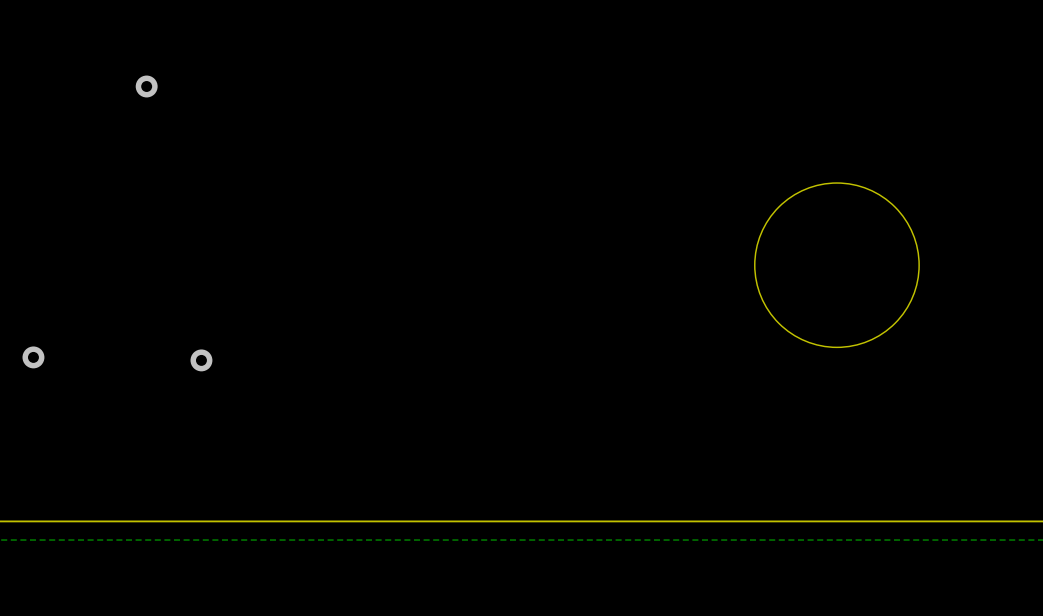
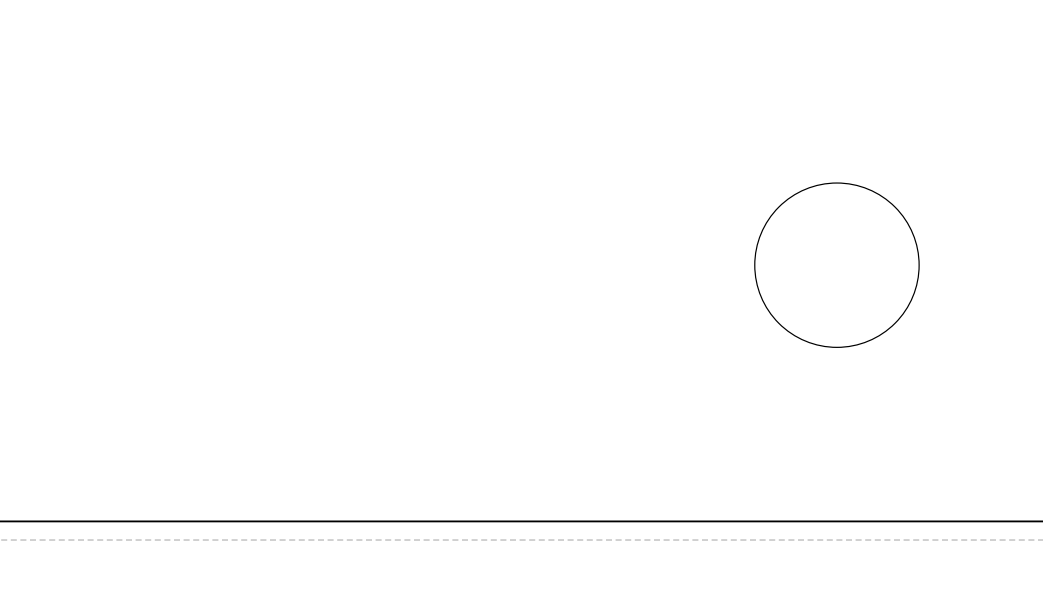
via: (146, 86) -> none
via: (33, 357) -> none
via: (201, 360) -> none

